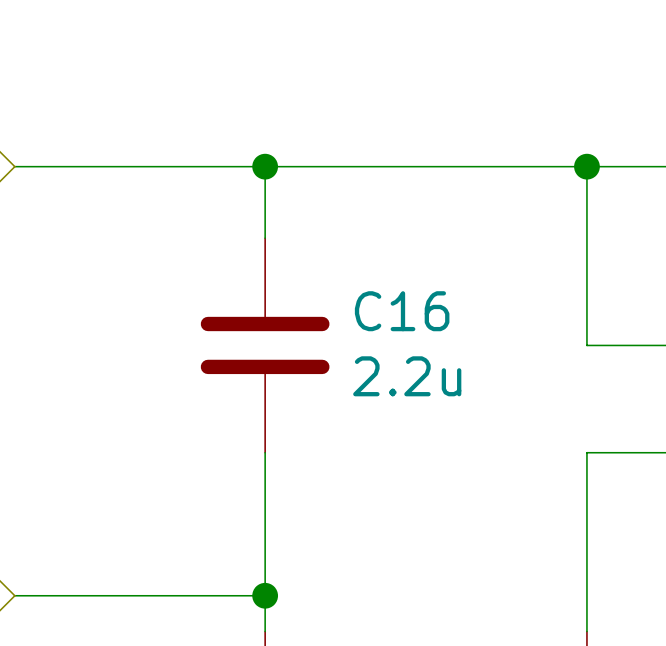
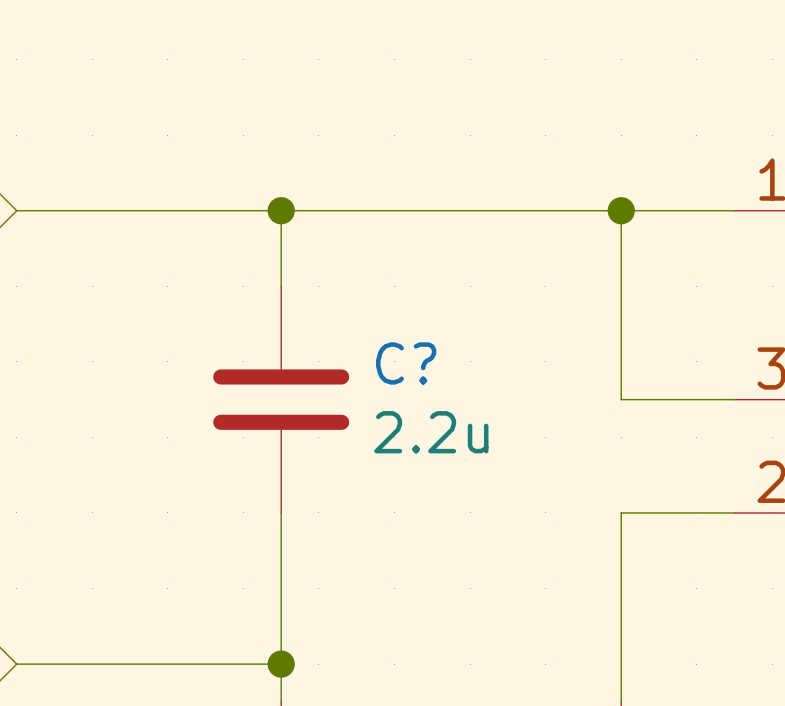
C16 name: C16 (402, 311) -> C? (406, 363)

